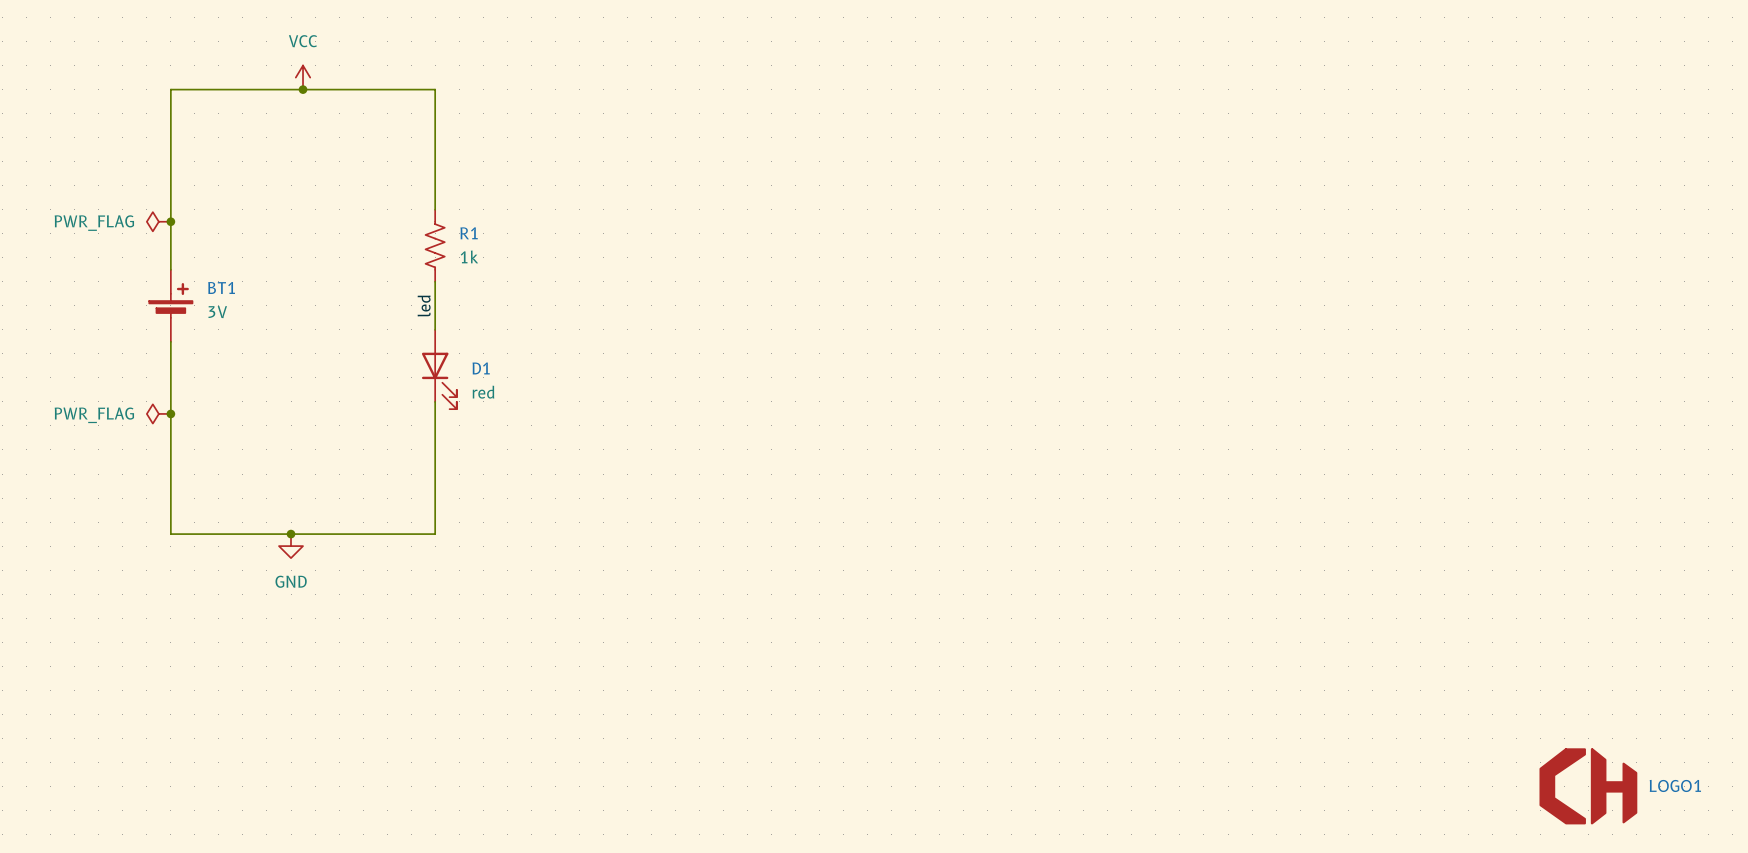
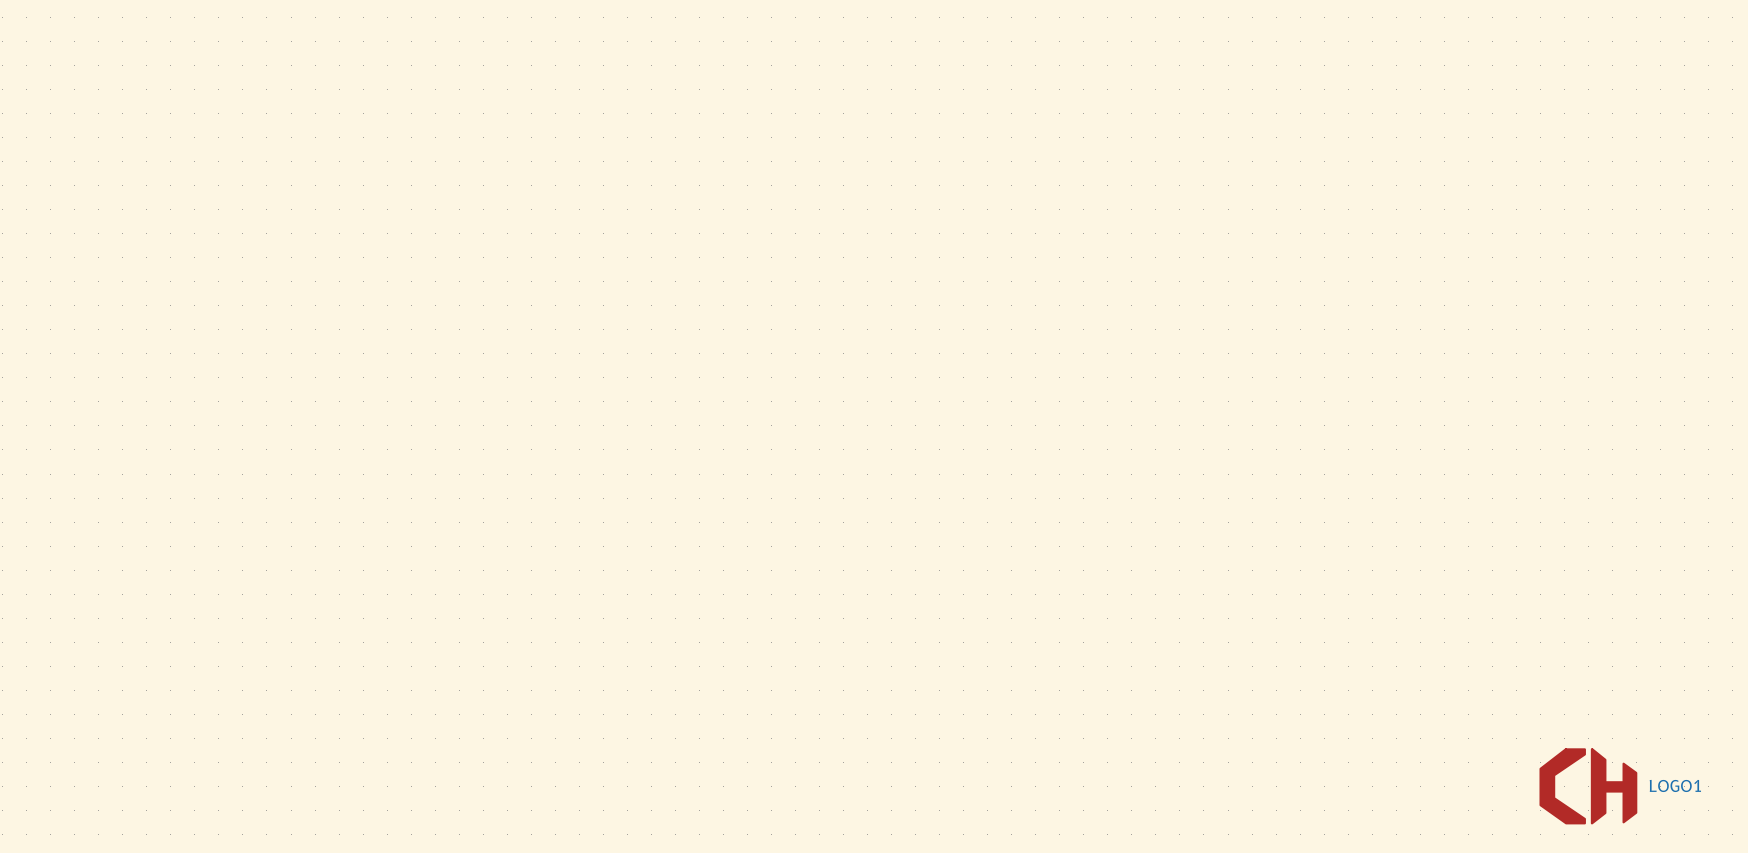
power symbol: VCC (303, 77) -> none
junction: (303, 89) -> none
wire: (435, 209) (435, 89) (170, 89) (170, 269) -> none
power symbol: PWR_FLAG (158, 221) -> none
junction: (170, 221) -> none
R1: 1k (435, 245) -> none
wire: (435, 281) (435, 329) -> none
BT1: 3V (170, 305) -> none
label: led (424, 305) -> none
wire: (170, 341) (170, 534) (435, 534) (435, 401) -> none
D1: red (439, 369) -> none
power symbol: PWR_FLAG (158, 413) -> none
junction: (170, 413) -> none
junction: (291, 534) -> none
power symbol: GND (291, 546) -> none

